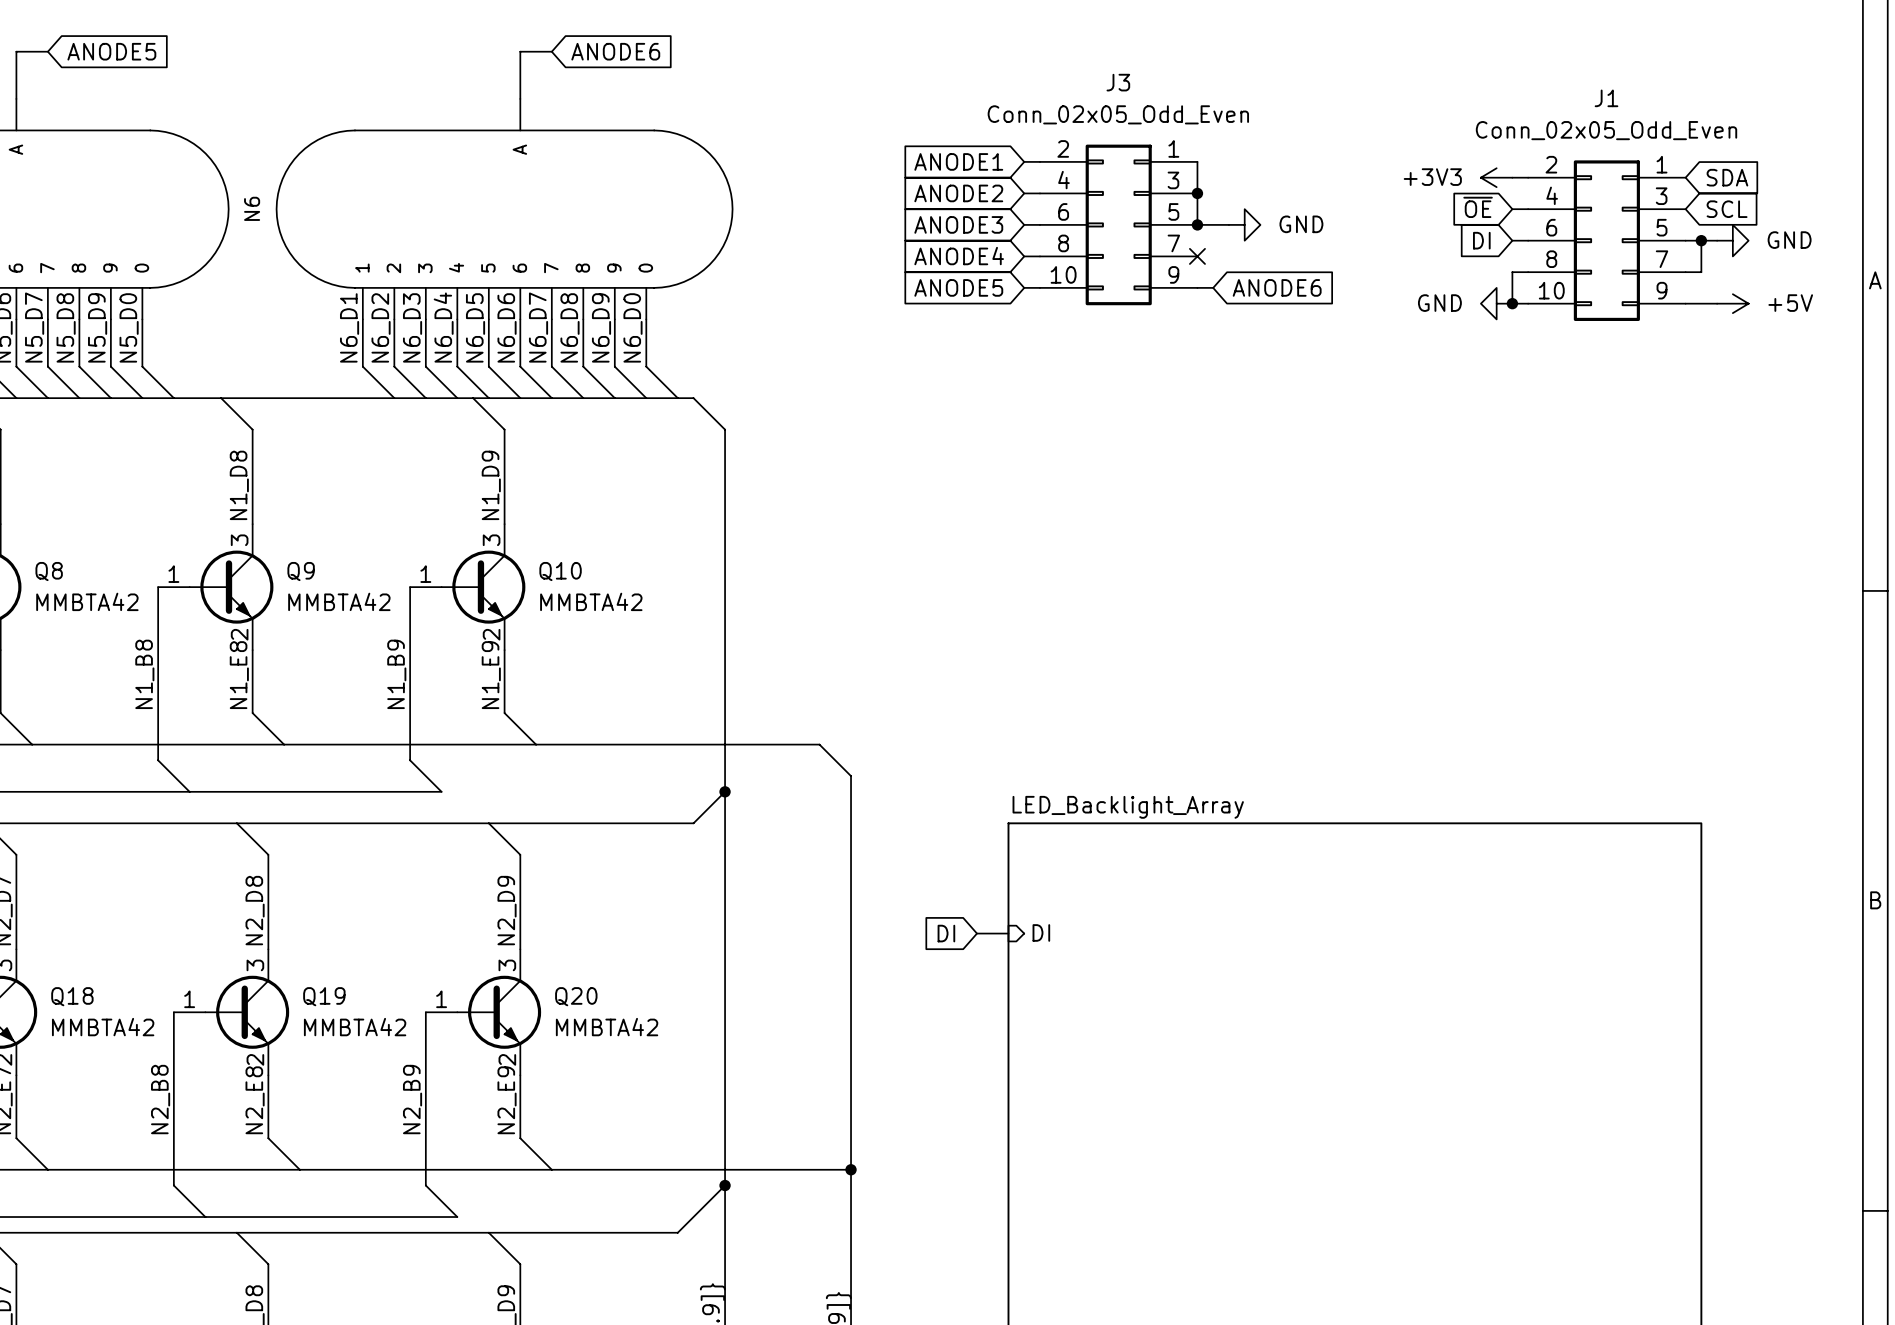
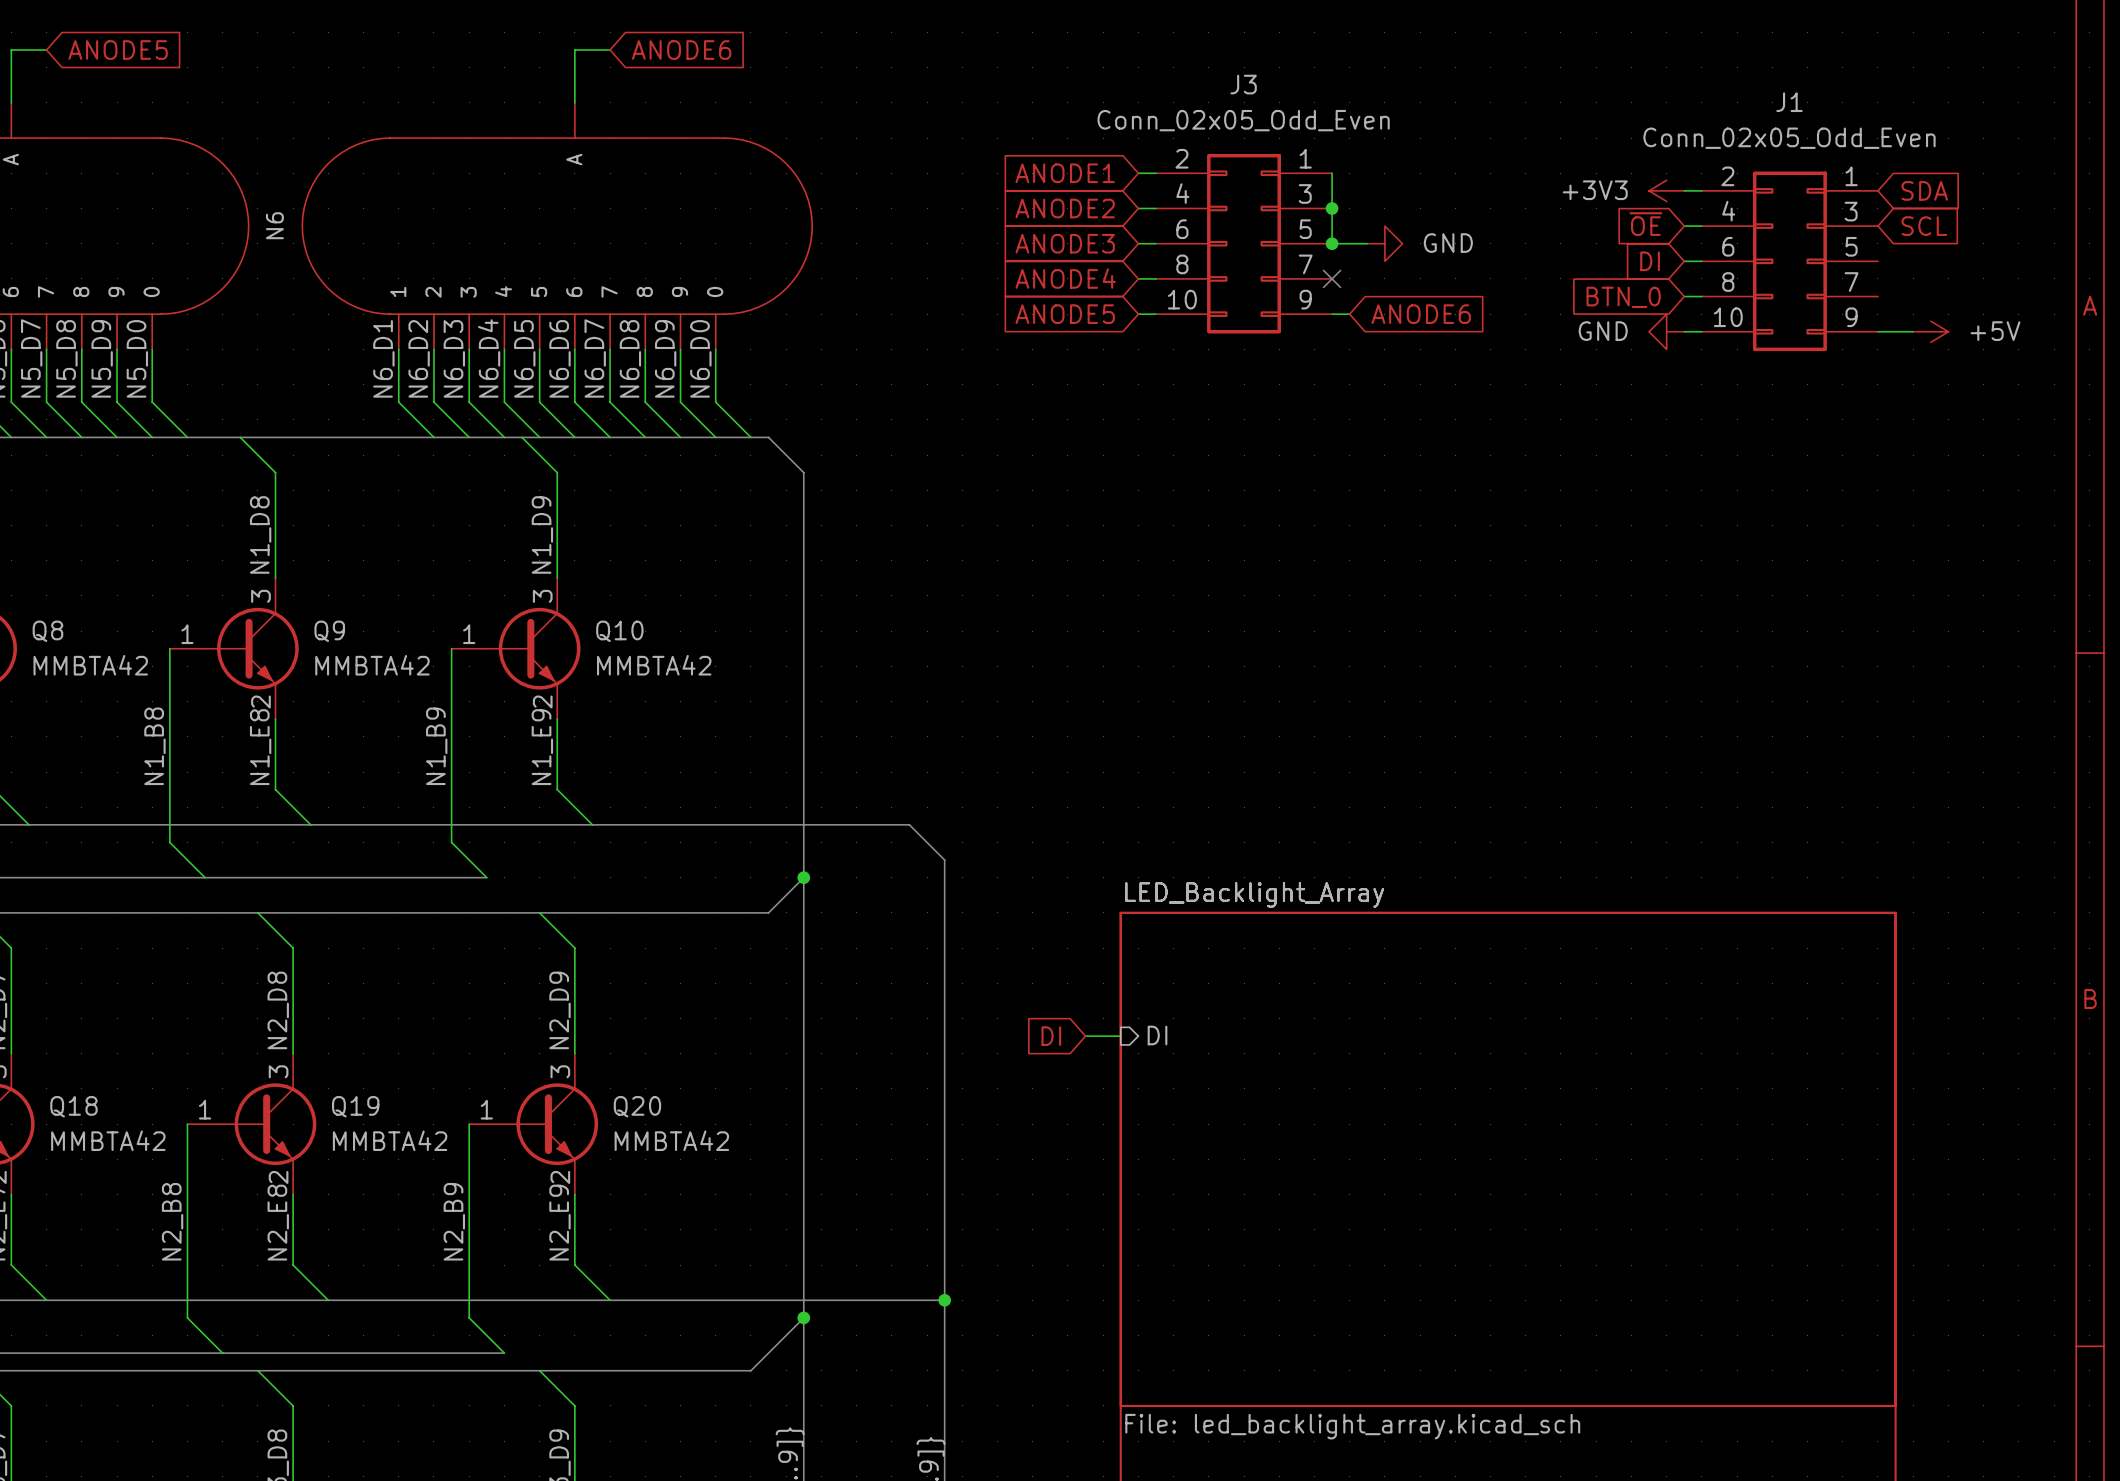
wire: (1685, 240) (1717, 240) -> none
wire: (1701, 240) (1701, 272) (1685, 272) -> none
junction: (1701, 240) -> none
power symbol: GND (1732, 240) -> none
global label: none -> BTN_0 (1623, 297)
wire: (1512, 272) (1512, 303) -> none
junction: (1512, 303) -> none
sheet LED_Backlight_Array: none -> File: led_backlight_array.kicad_sch (1508, 1159)

